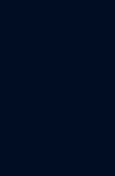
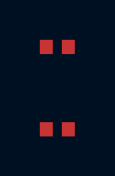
part: none -> (57, 46)
part: none -> (57, 129)

